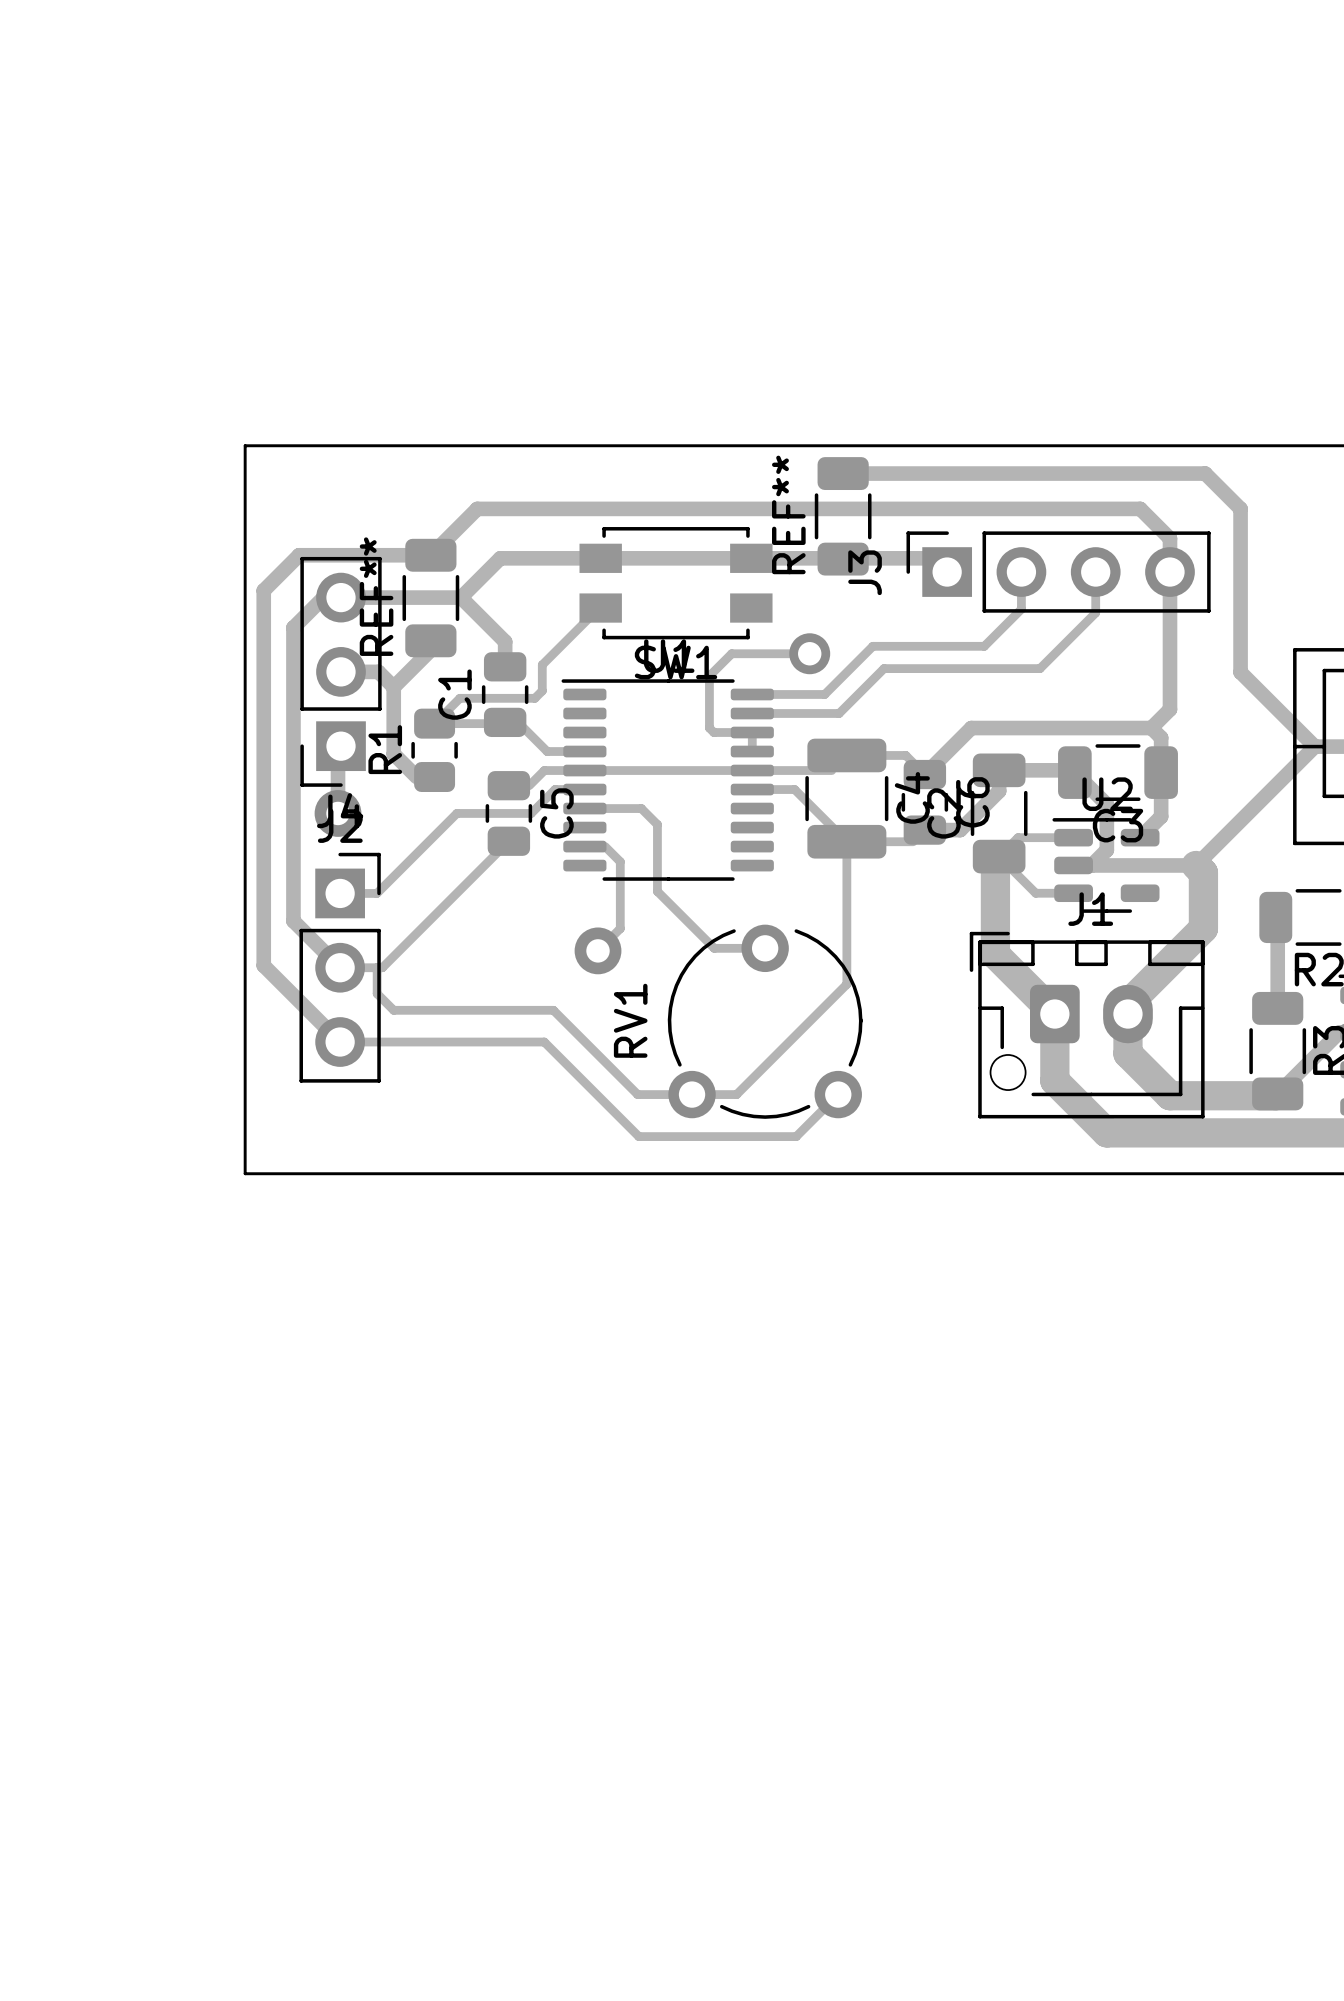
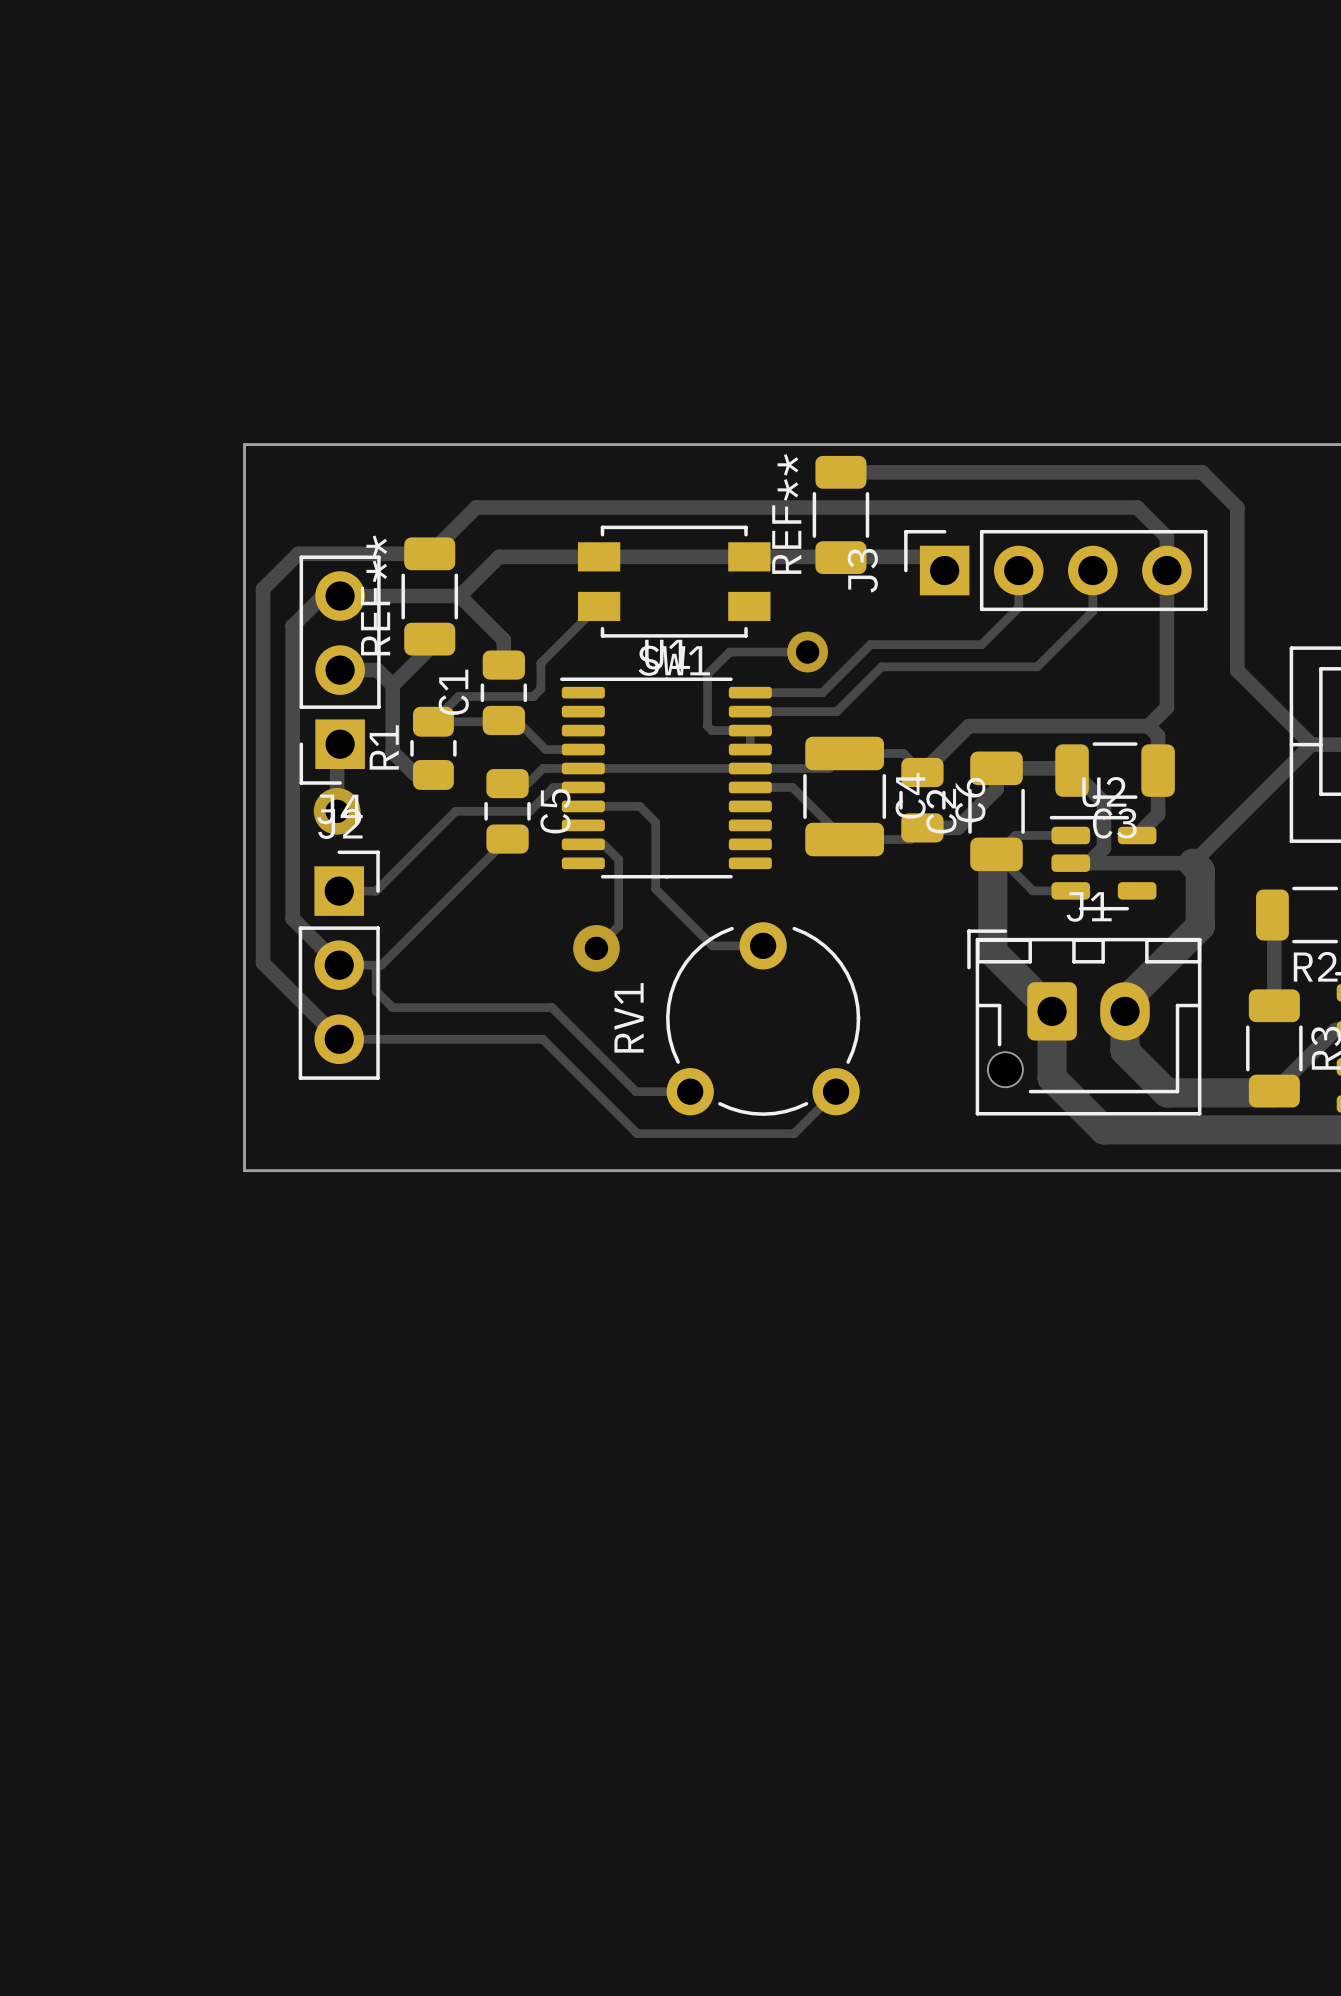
track: (846, 841) (846, 984) (736, 1094) (692, 1094) -> none

